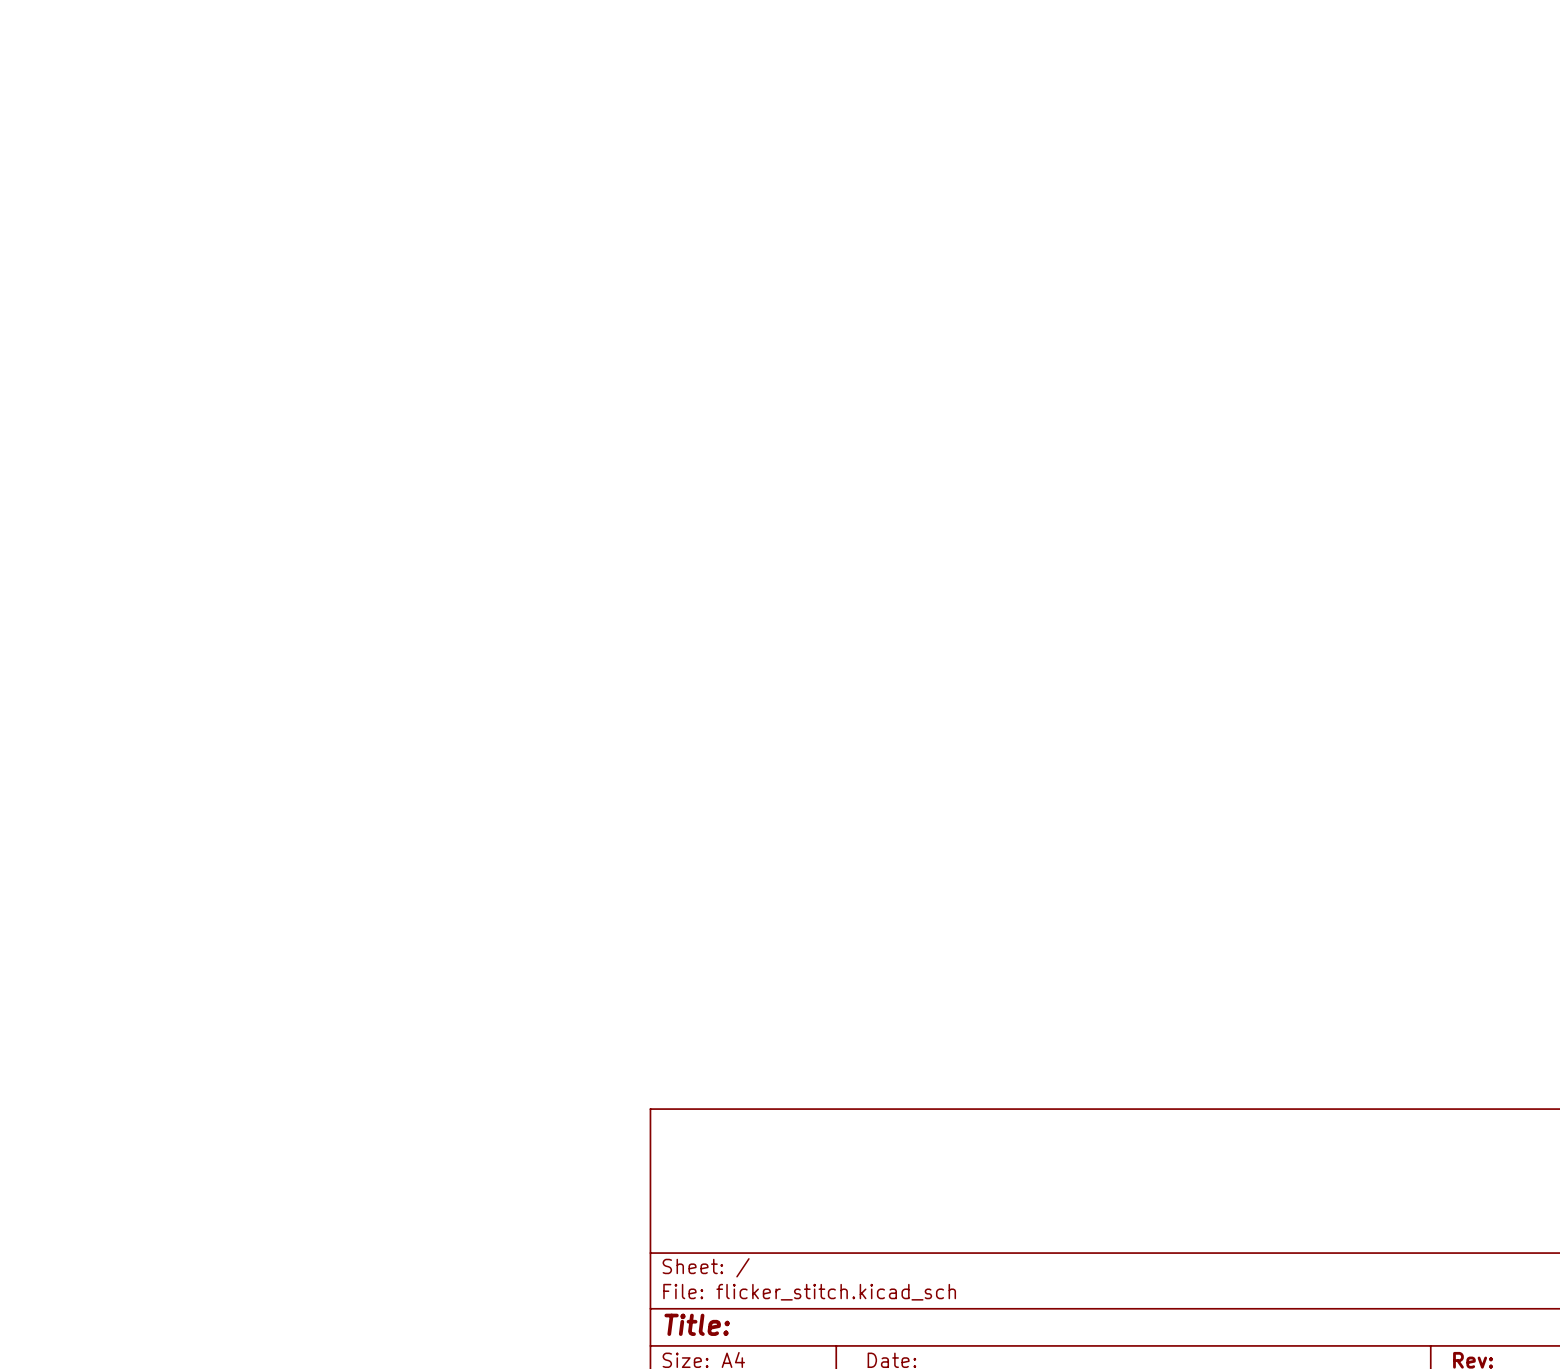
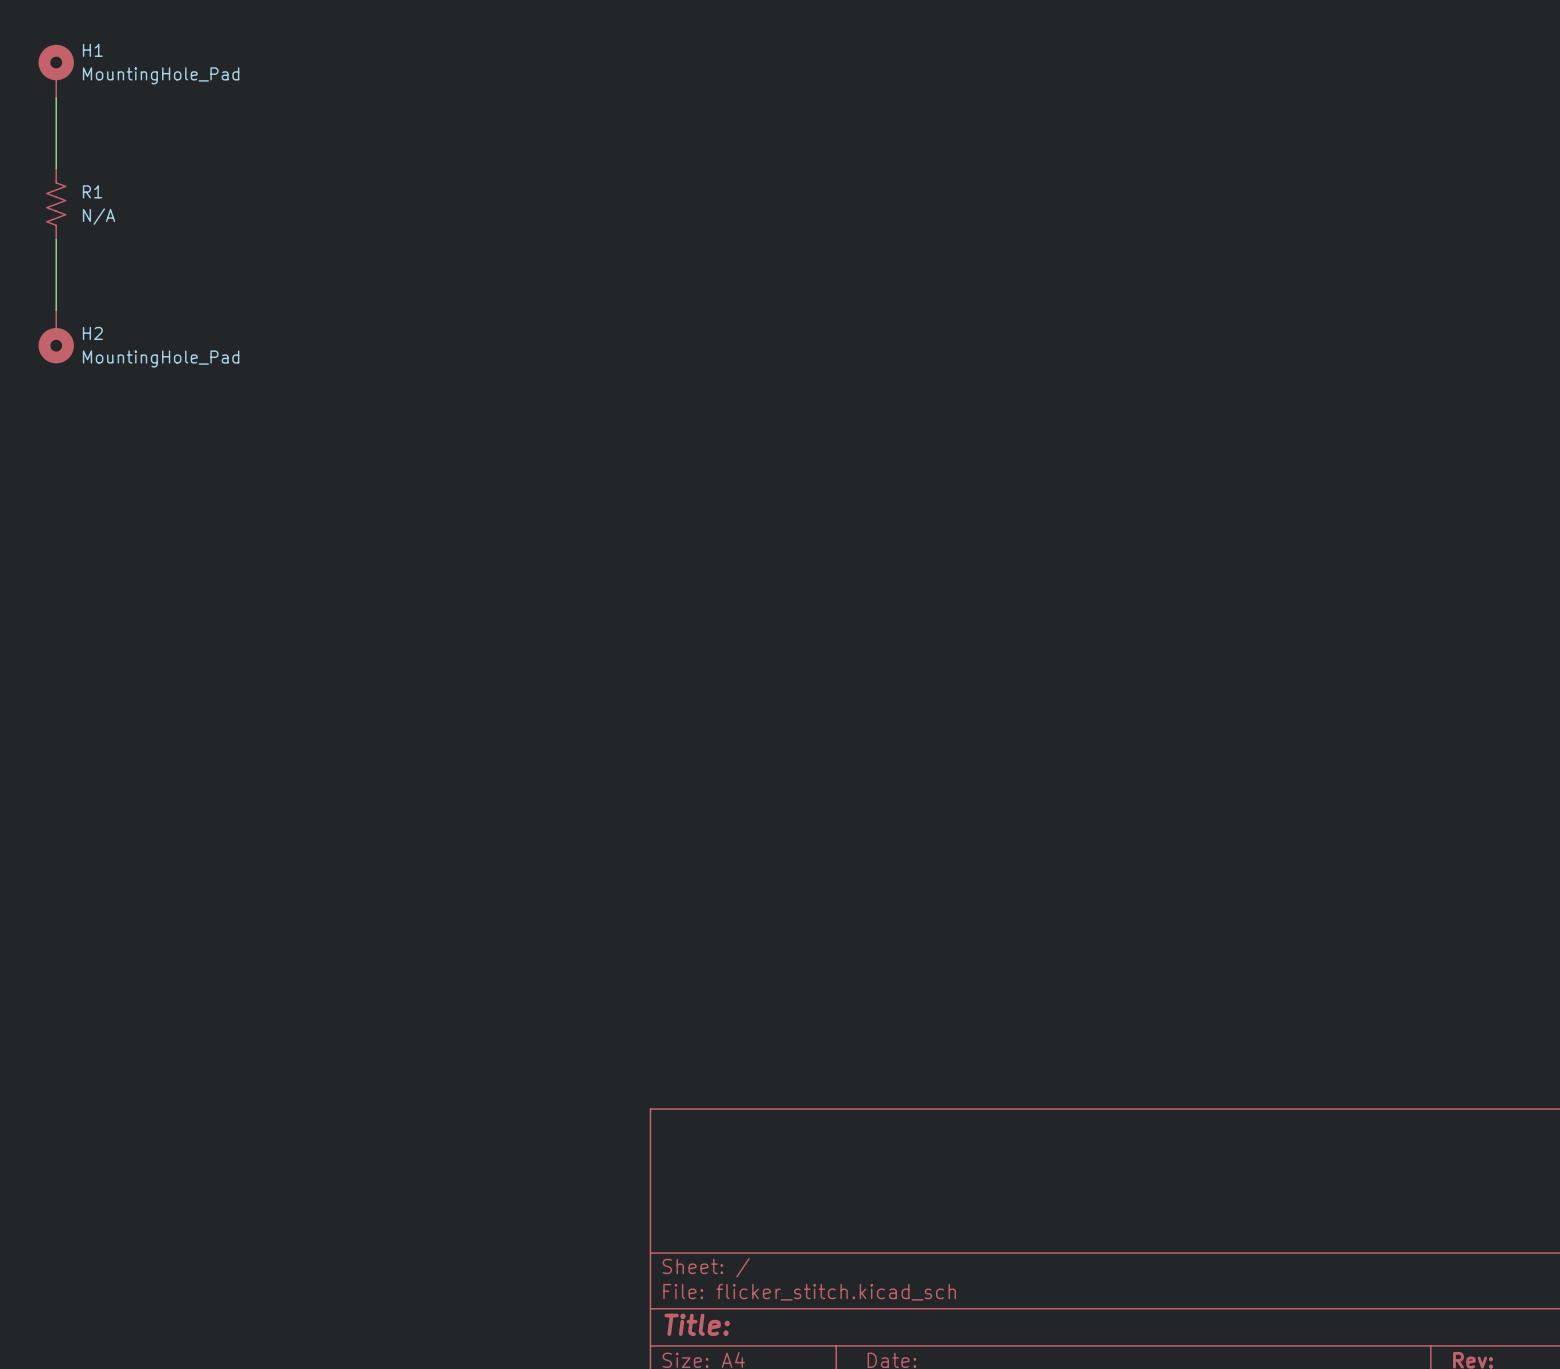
H1: none -> MountingHole_Pad (56, 71)
wire: none -> (56, 97) (56, 168)
R1: none -> N/A (56, 204)
wire: none -> (56, 239) (56, 310)
H2: none -> MountingHole_Pad (56, 336)

